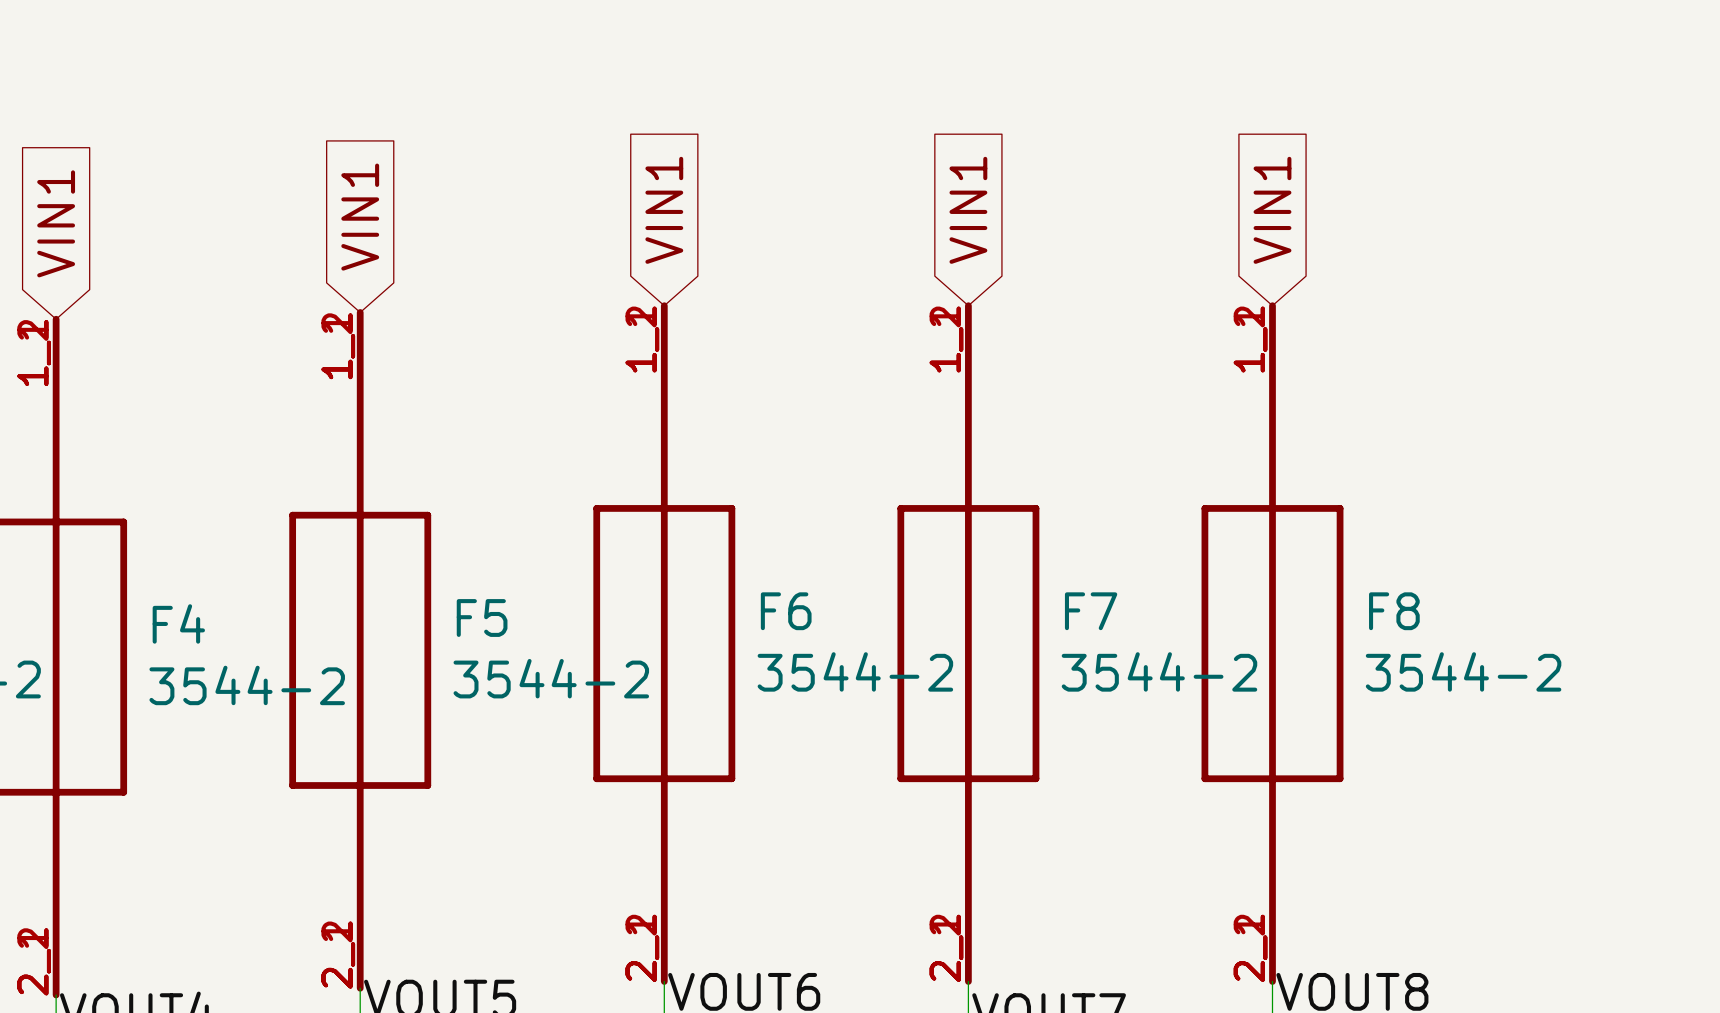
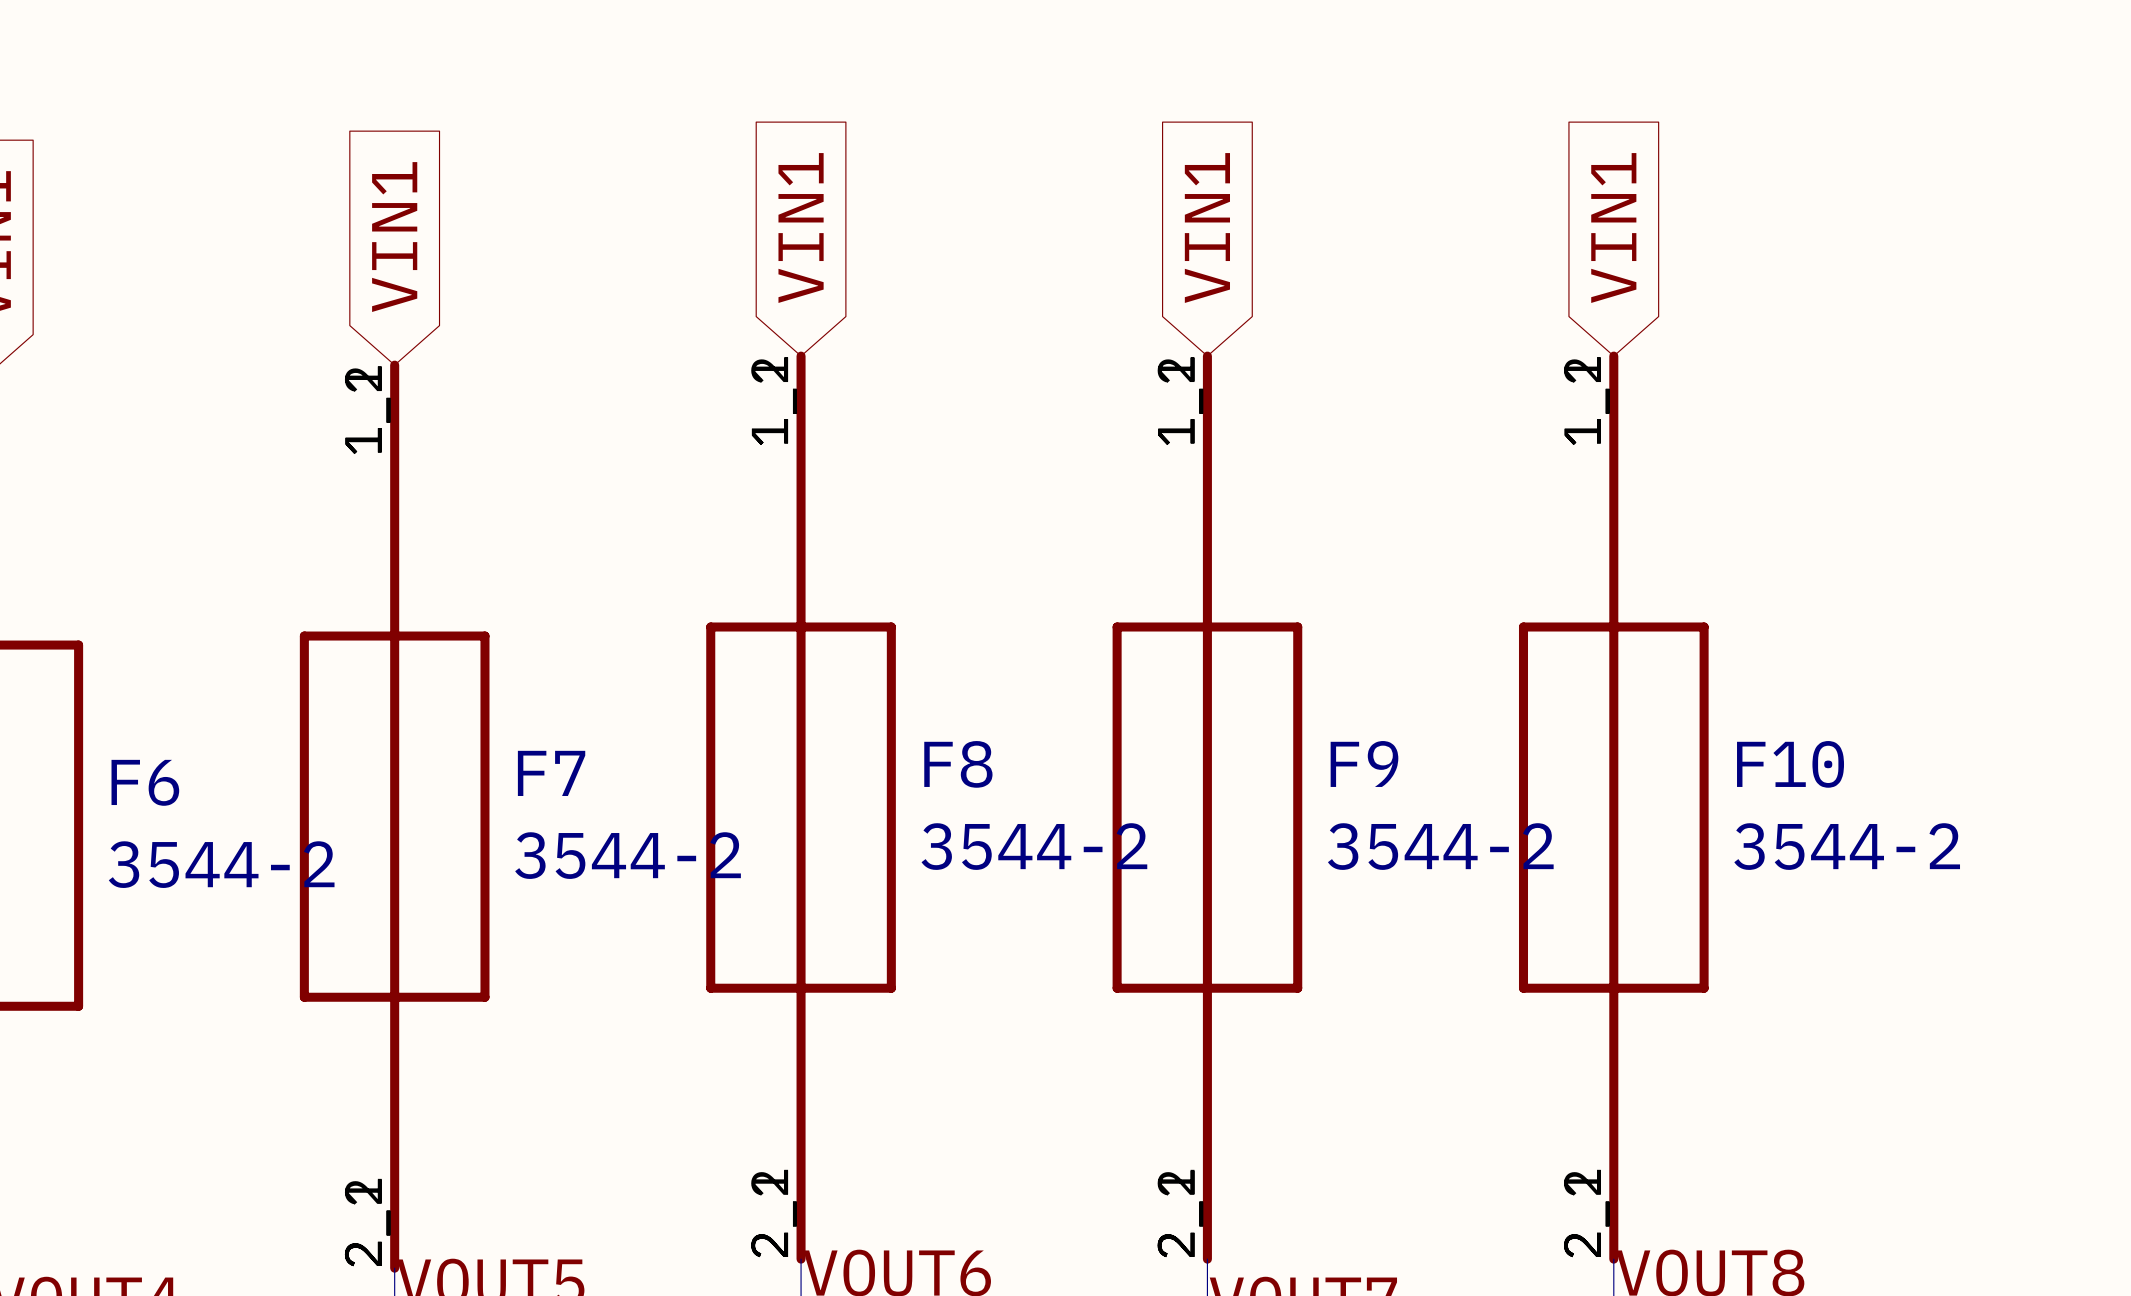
F6 name: F6 (786, 611) -> F8 (958, 764)
F7 name: F7 (1091, 611) -> F9 (1364, 763)
F8 name: F8 (1394, 611) -> F10 (1790, 764)
F5 name: F5 (482, 618) -> F7 (551, 773)
F4 name: F4 (178, 623) -> F6 (145, 782)

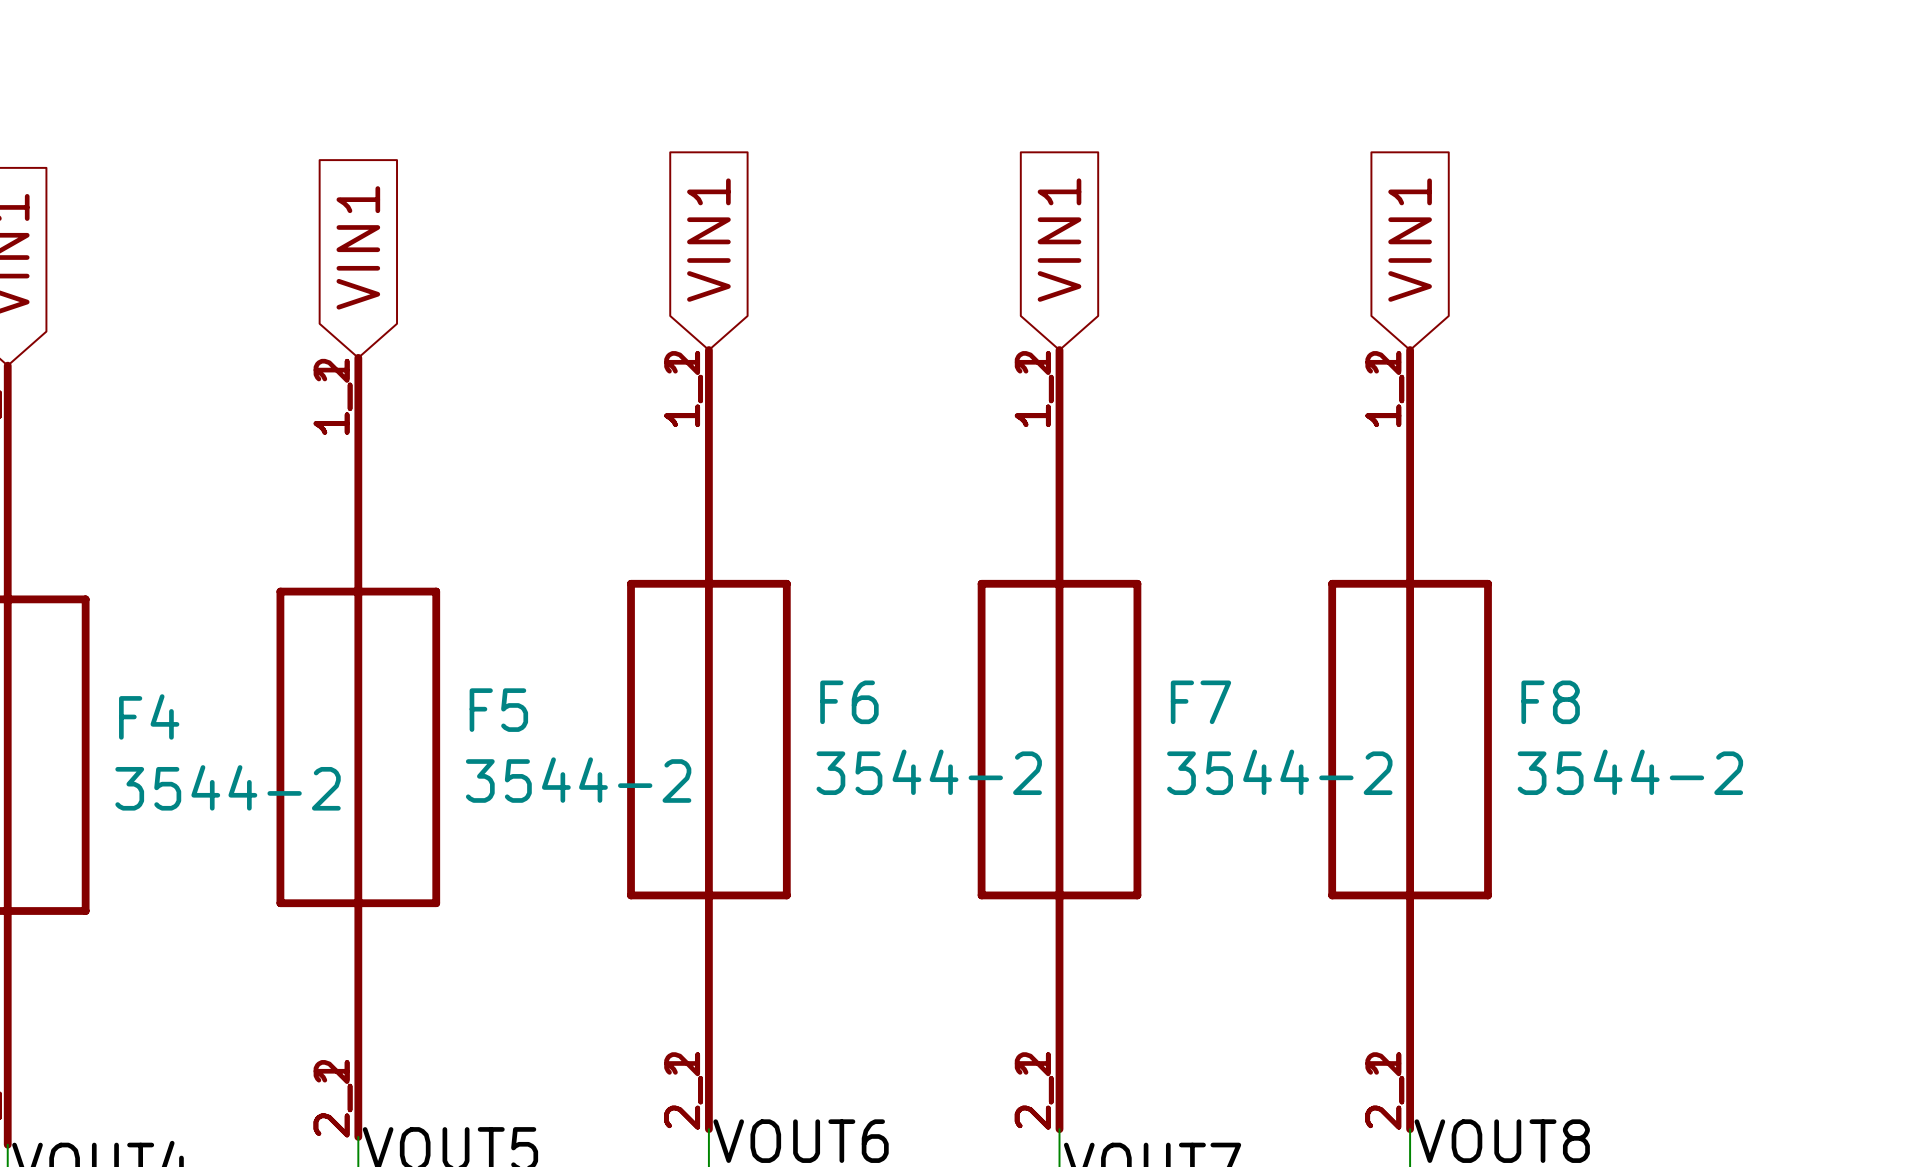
F9 name: F9 (1364, 763) -> F7 (1200, 702)
F8 name: F8 (958, 764) -> F6 (849, 702)
F10 name: F10 (1790, 764) -> F8 (1550, 702)
F7 name: F7 (551, 773) -> F5 (498, 710)
F6 name: F6 (145, 782) -> F4 (149, 716)

